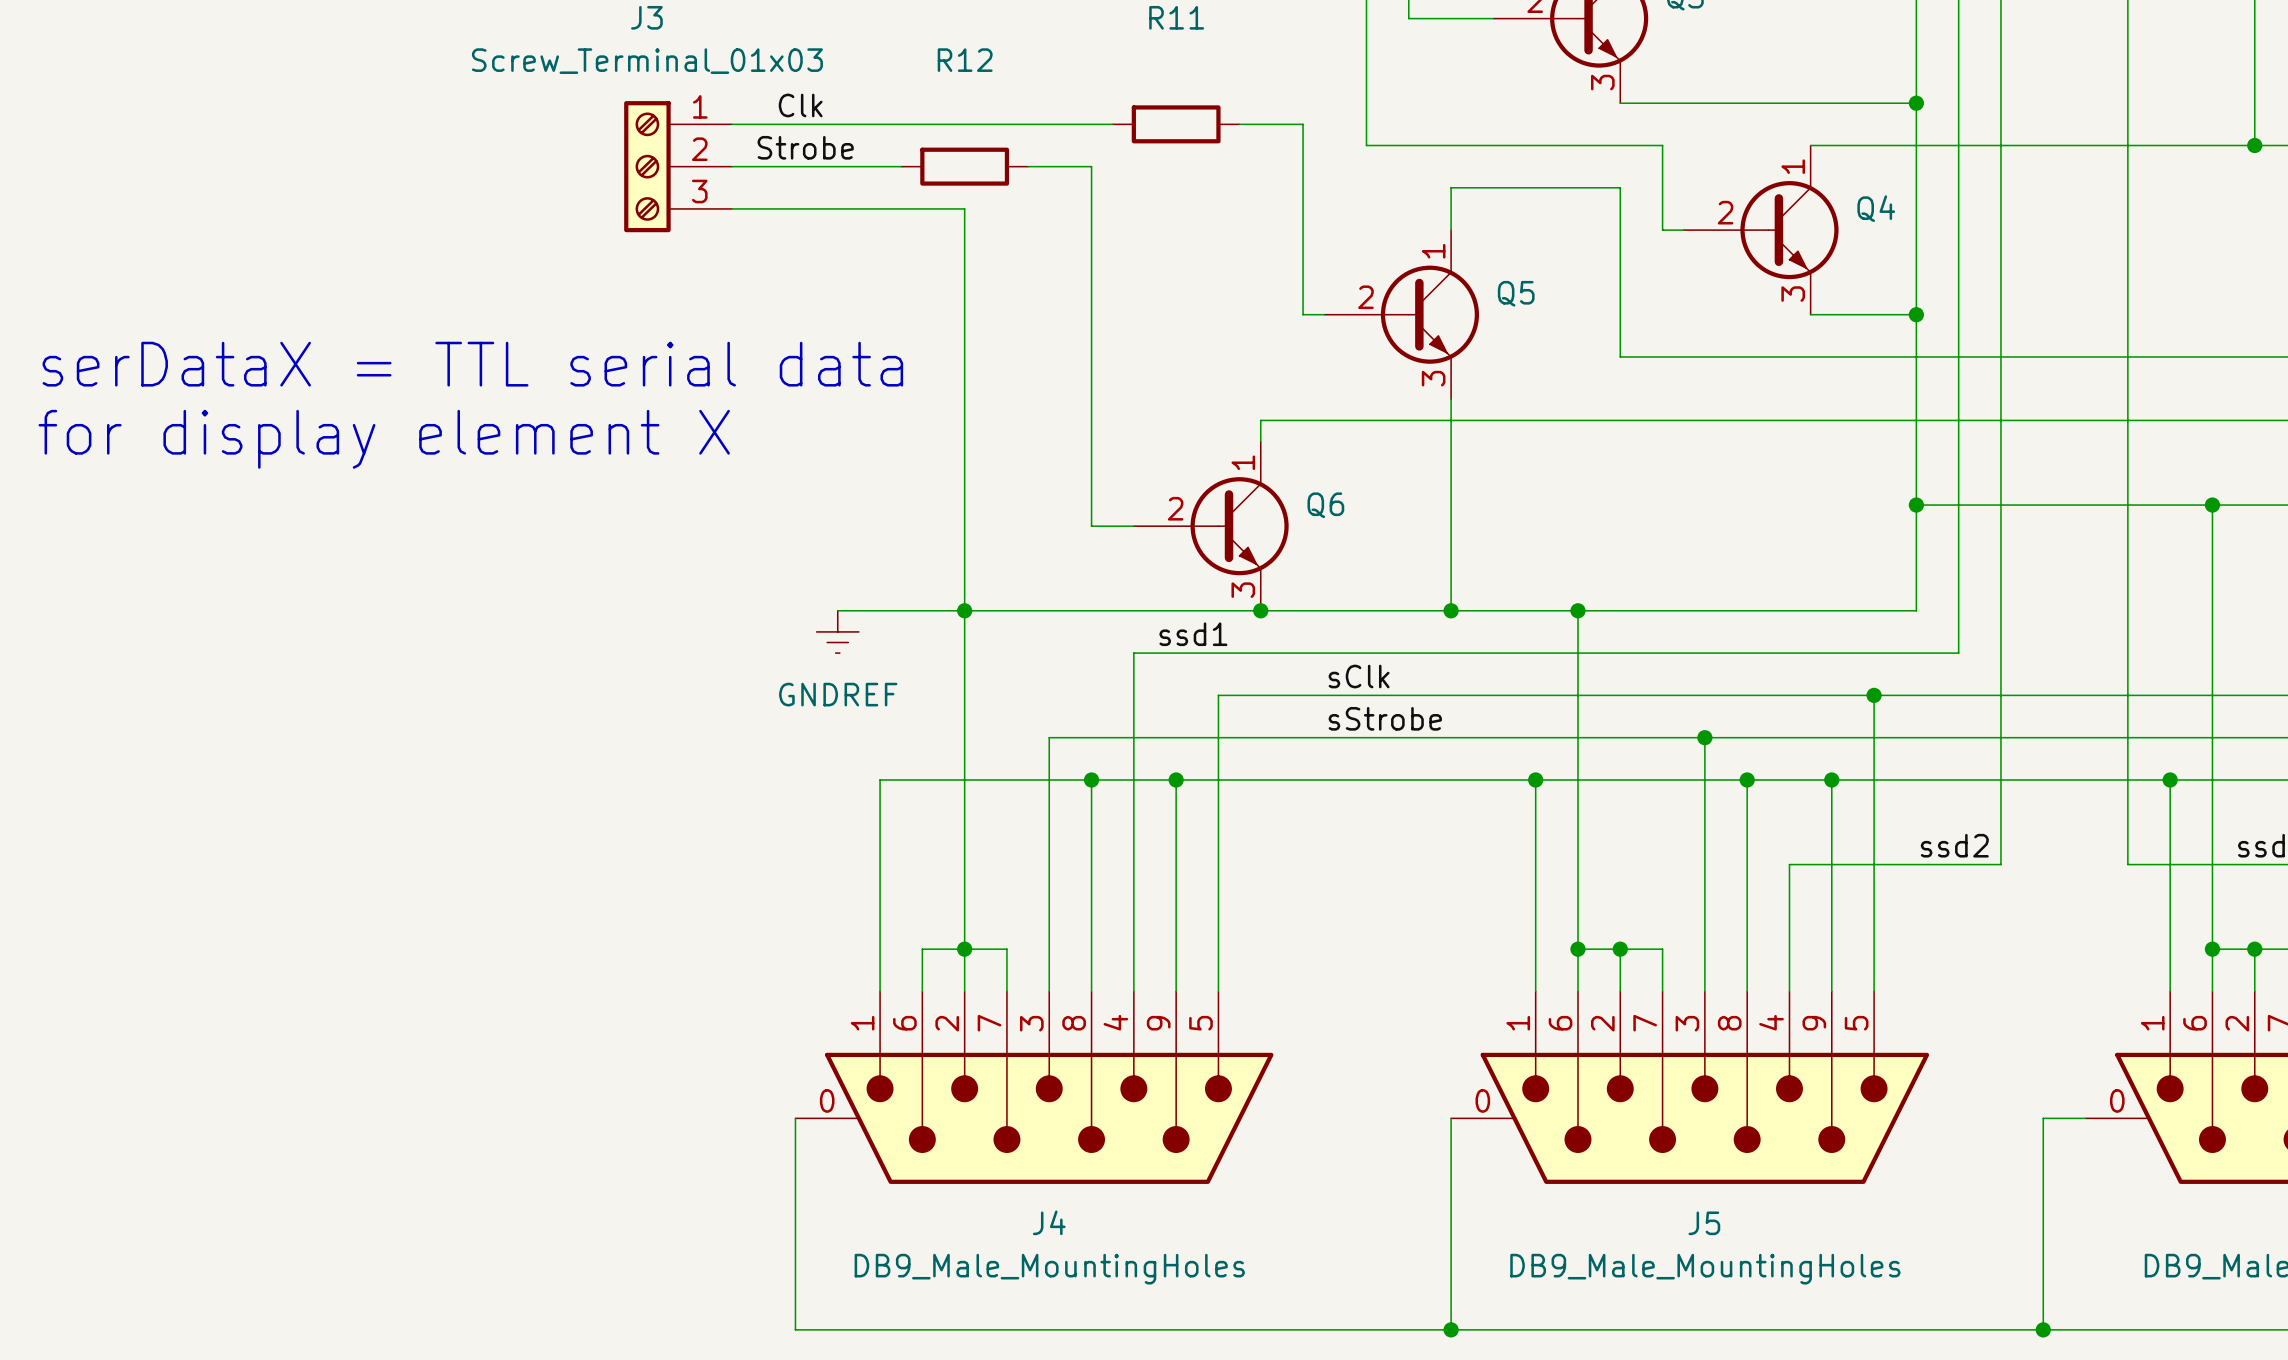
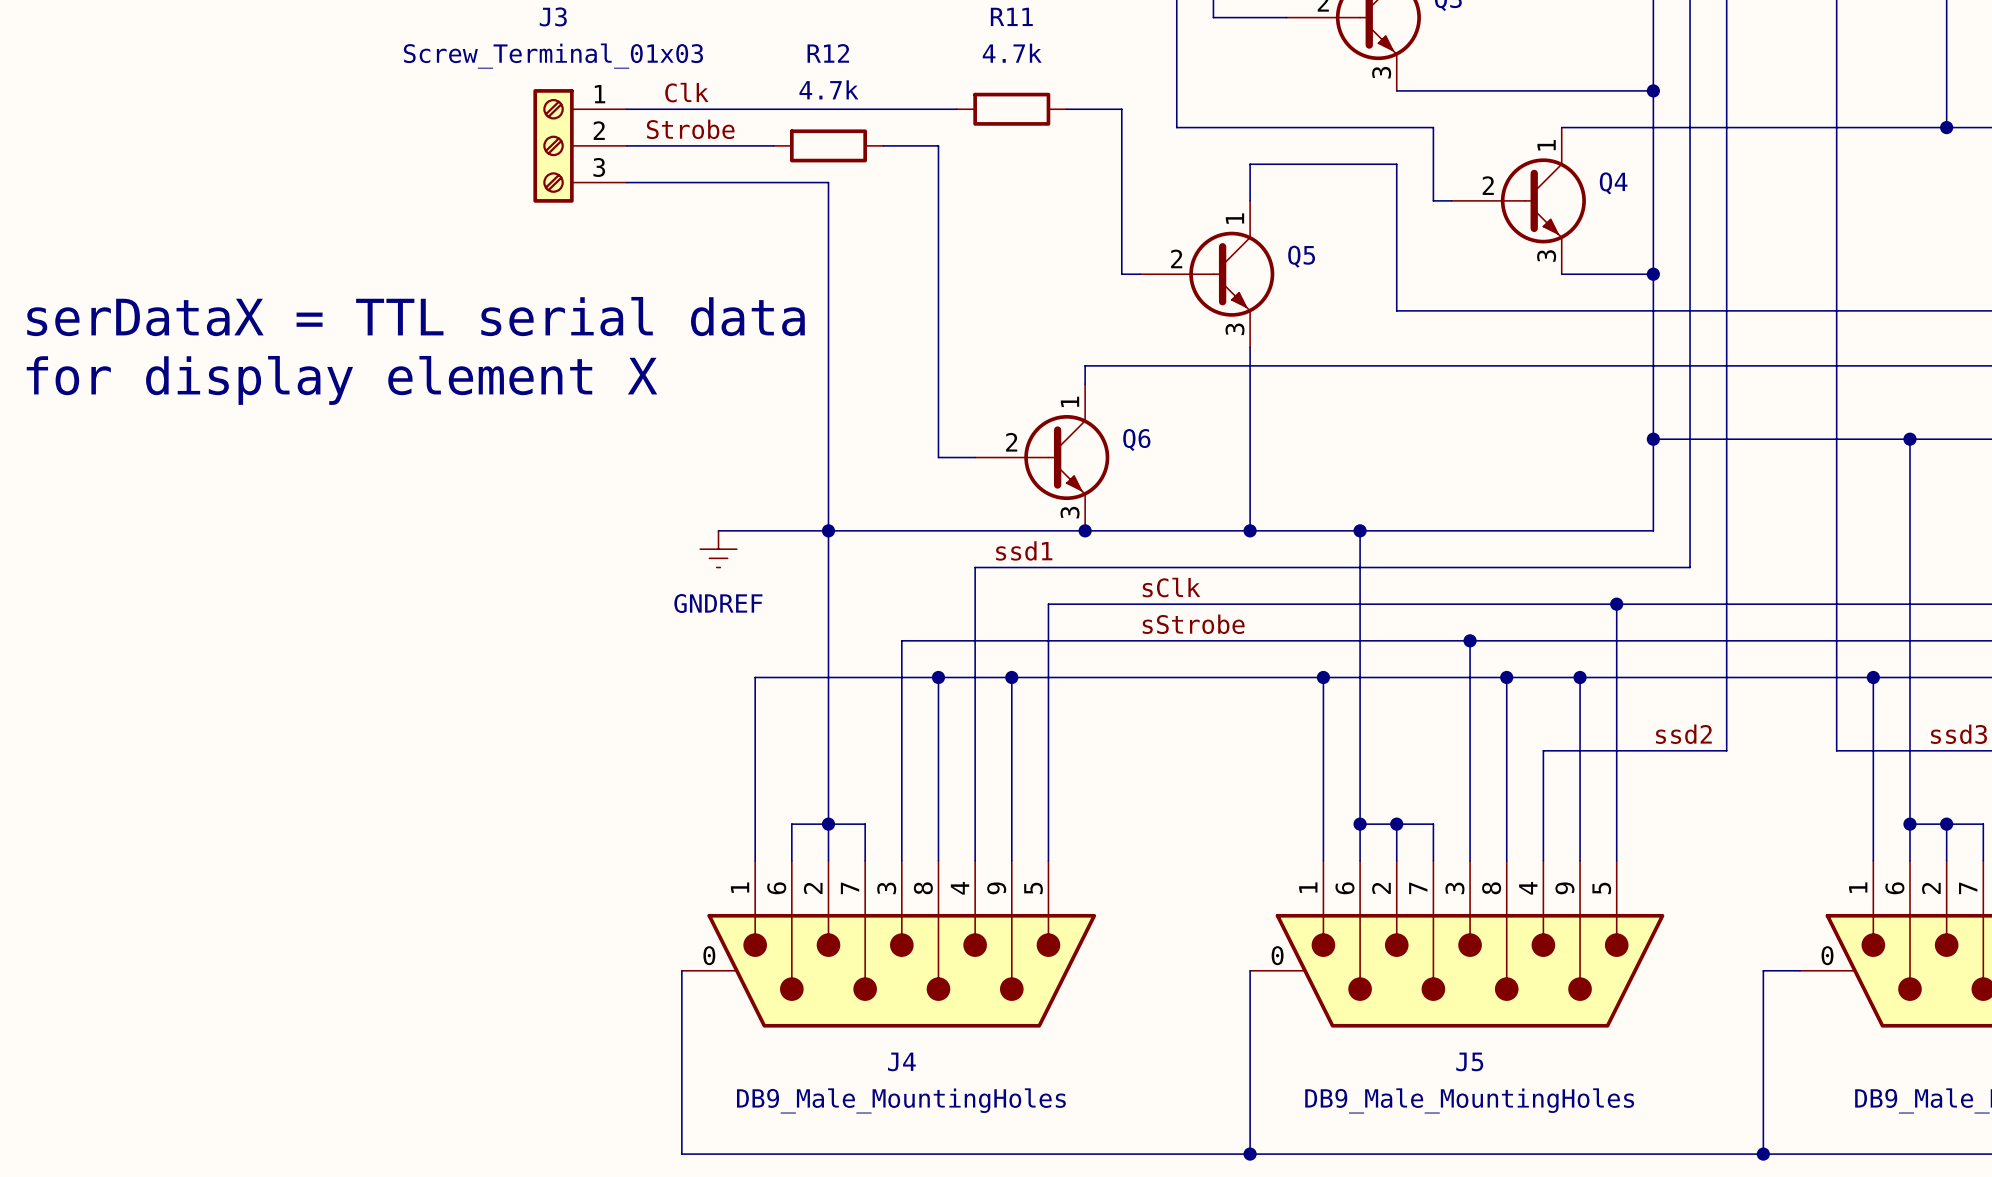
R11 value: none -> 4.7k (1012, 53)
R12 value: none -> 4.7k (828, 89)

